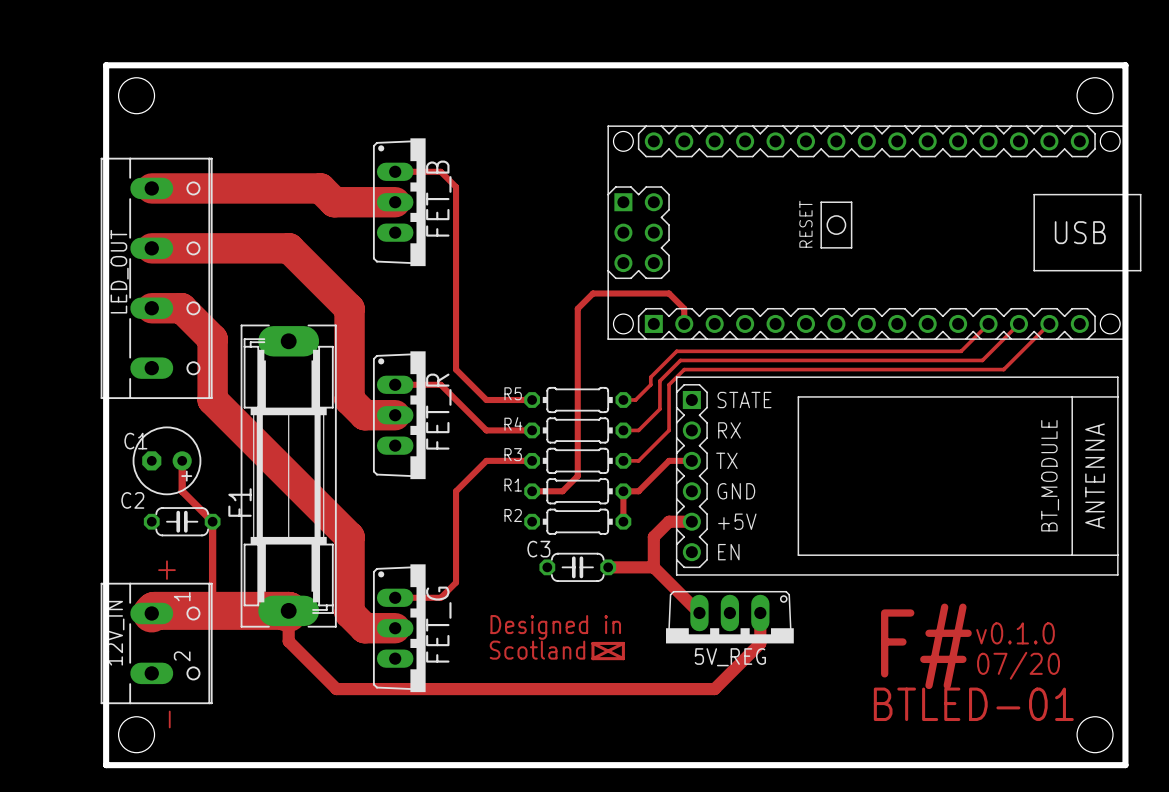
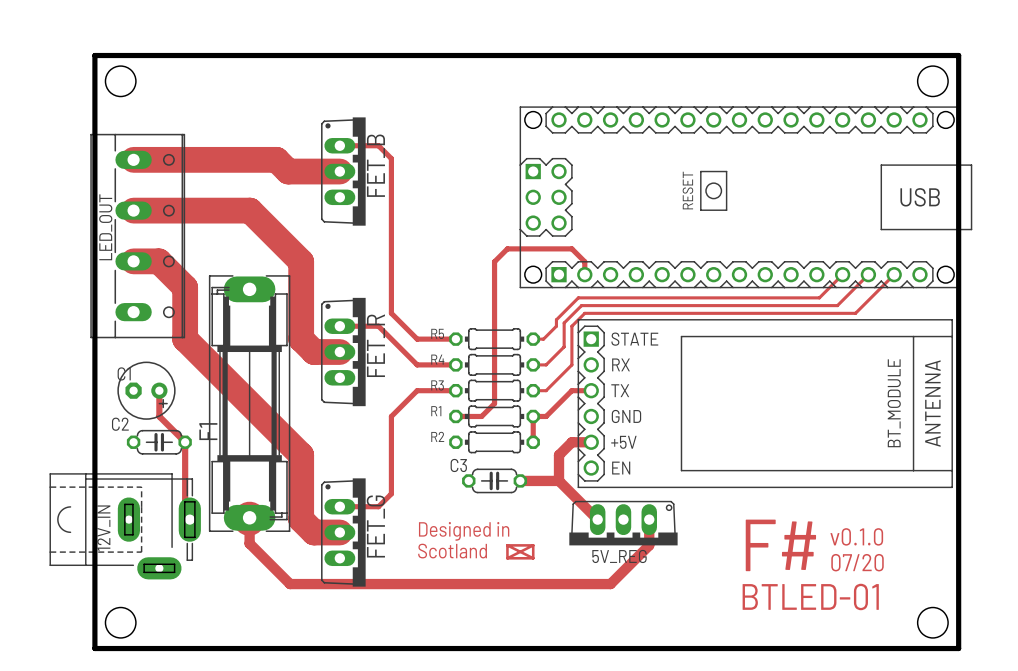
text: + (166, 570) -> none
12V_IN footprint: [100, 582, 213, 705] -> [49, 473, 201, 580]
track: (288, 610) (154, 610) (151, 613) -> none
text: - (169, 719) -> none

